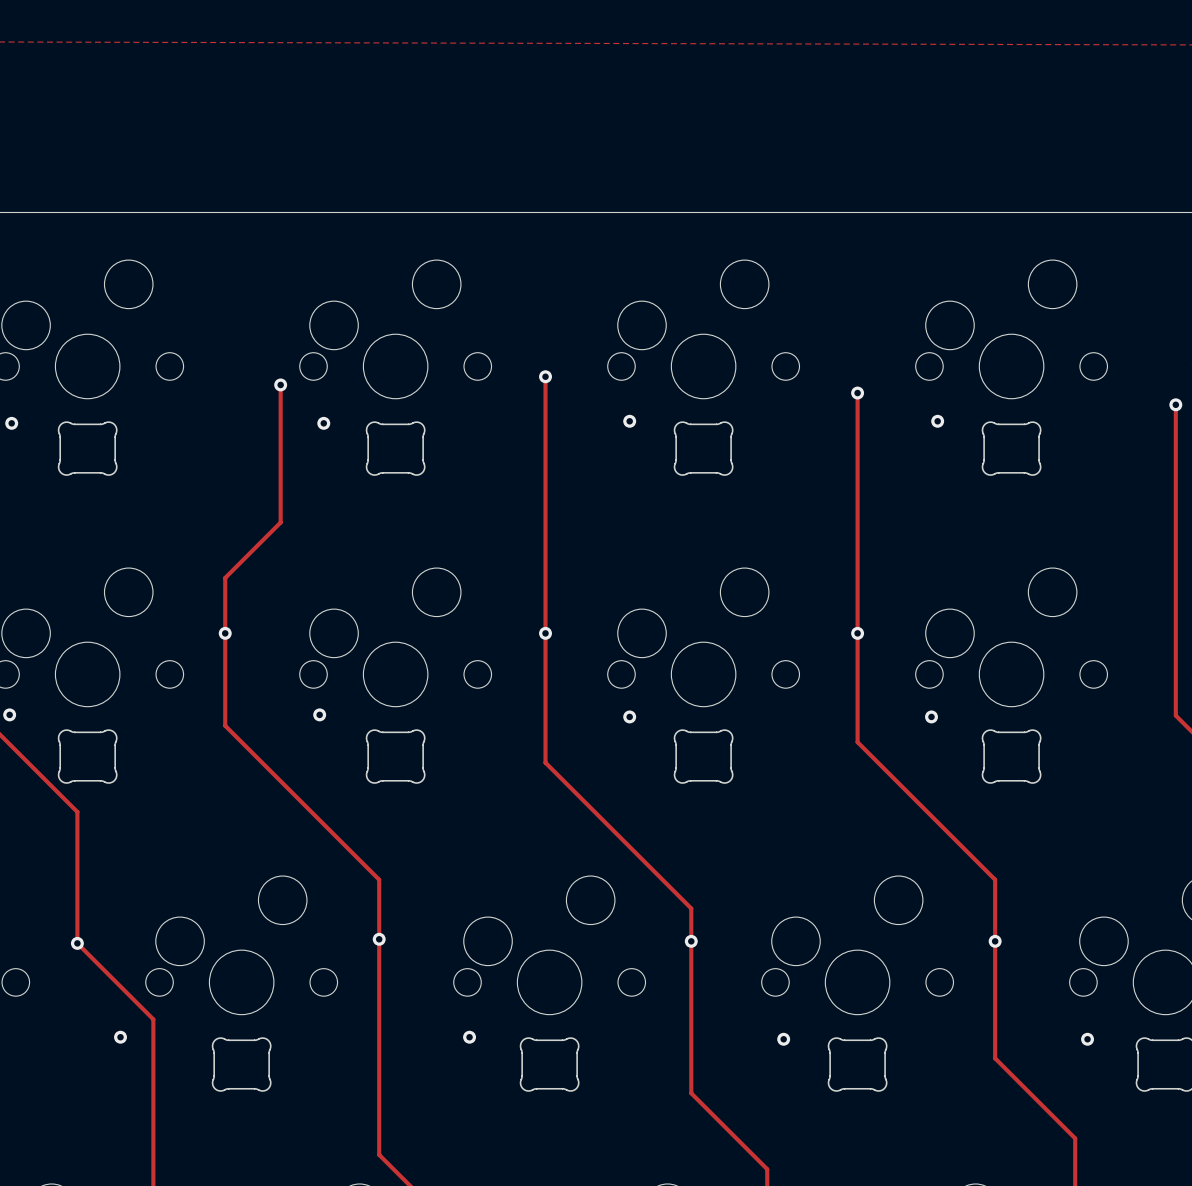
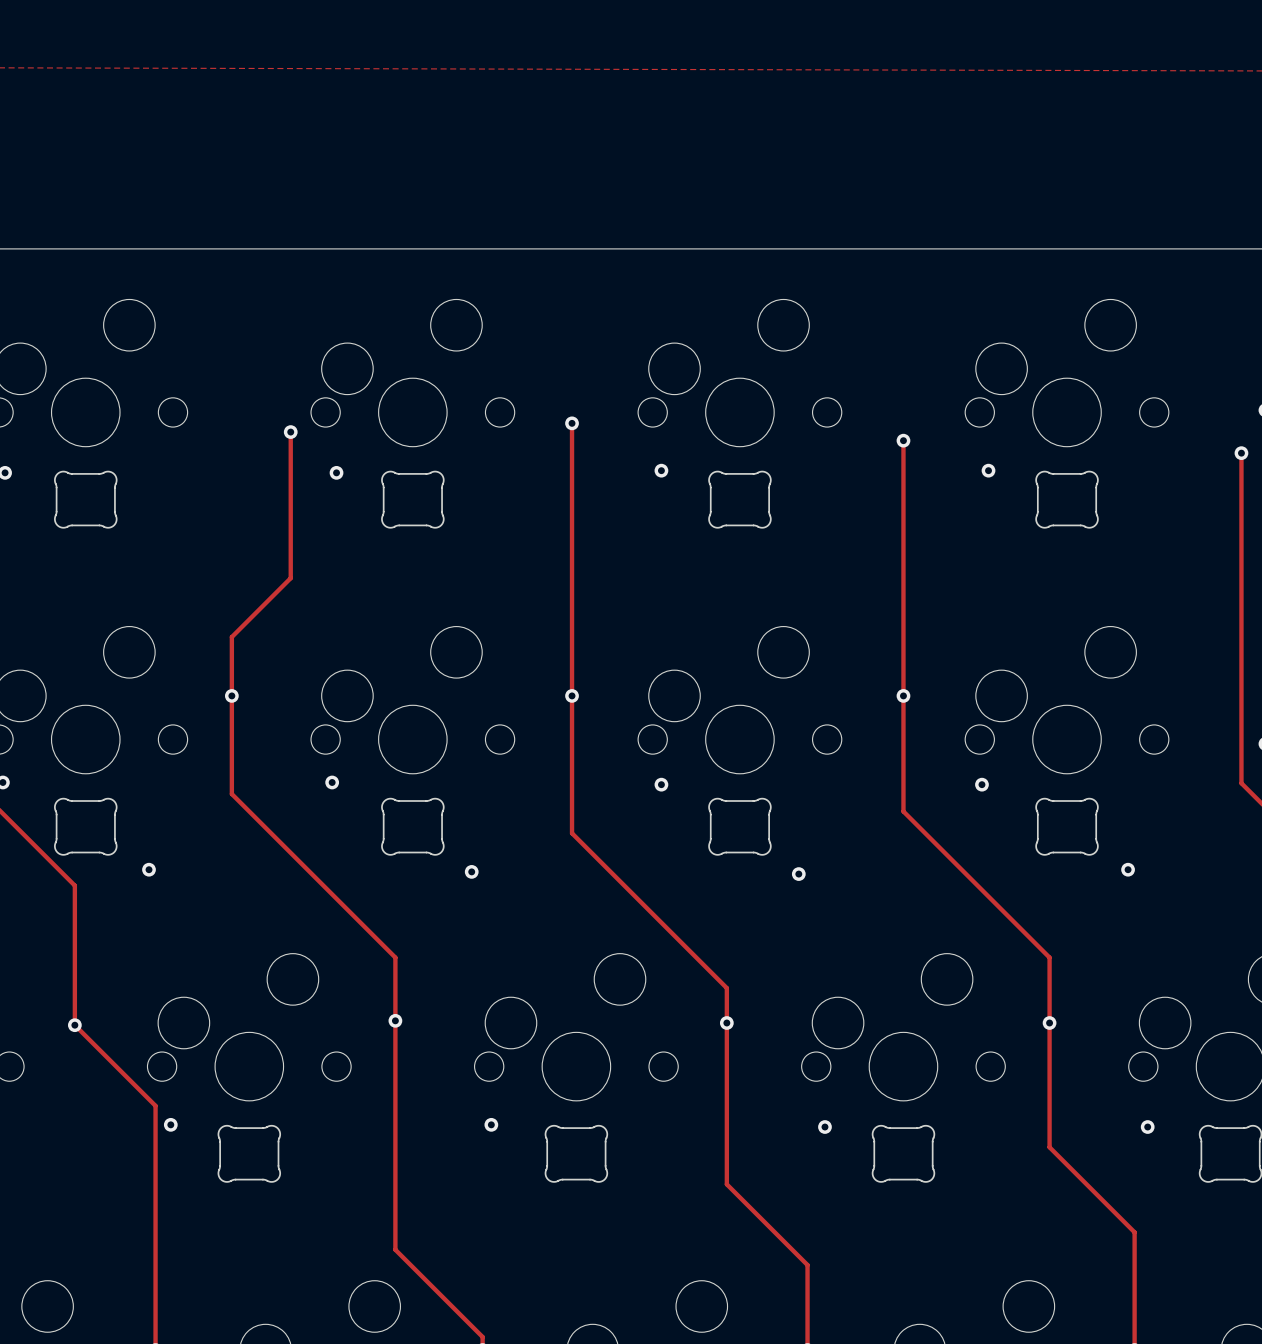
via: none -> (149, 869)
via: none -> (1128, 869)
via: none -> (471, 871)
via: none -> (798, 874)
via position: (120, 1037) -> (170, 1124)

